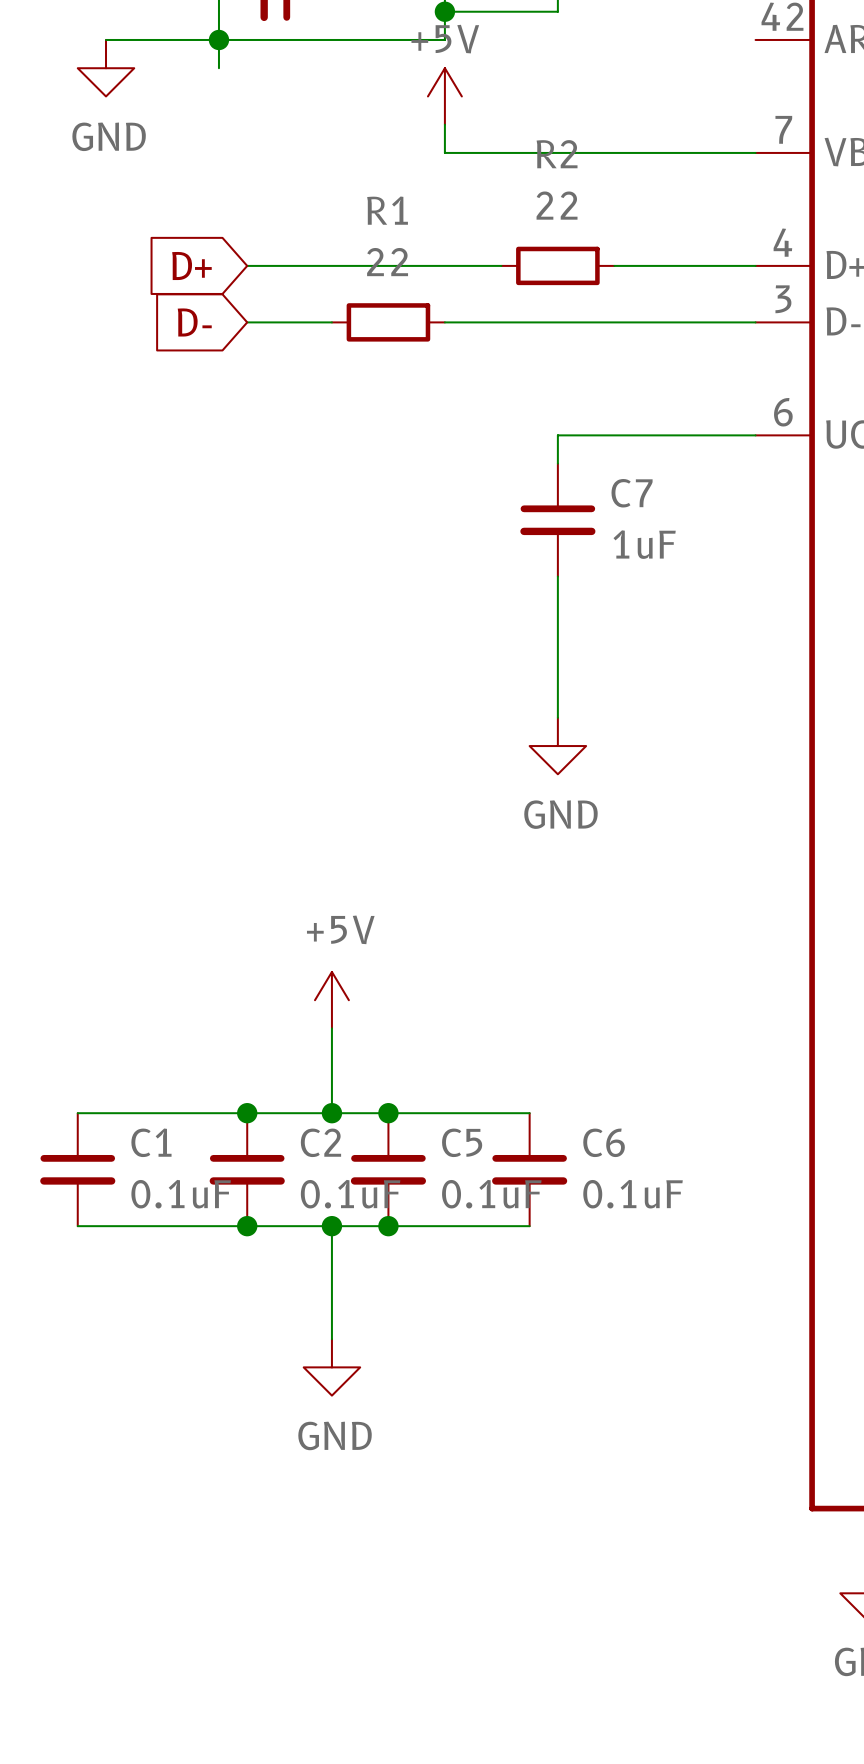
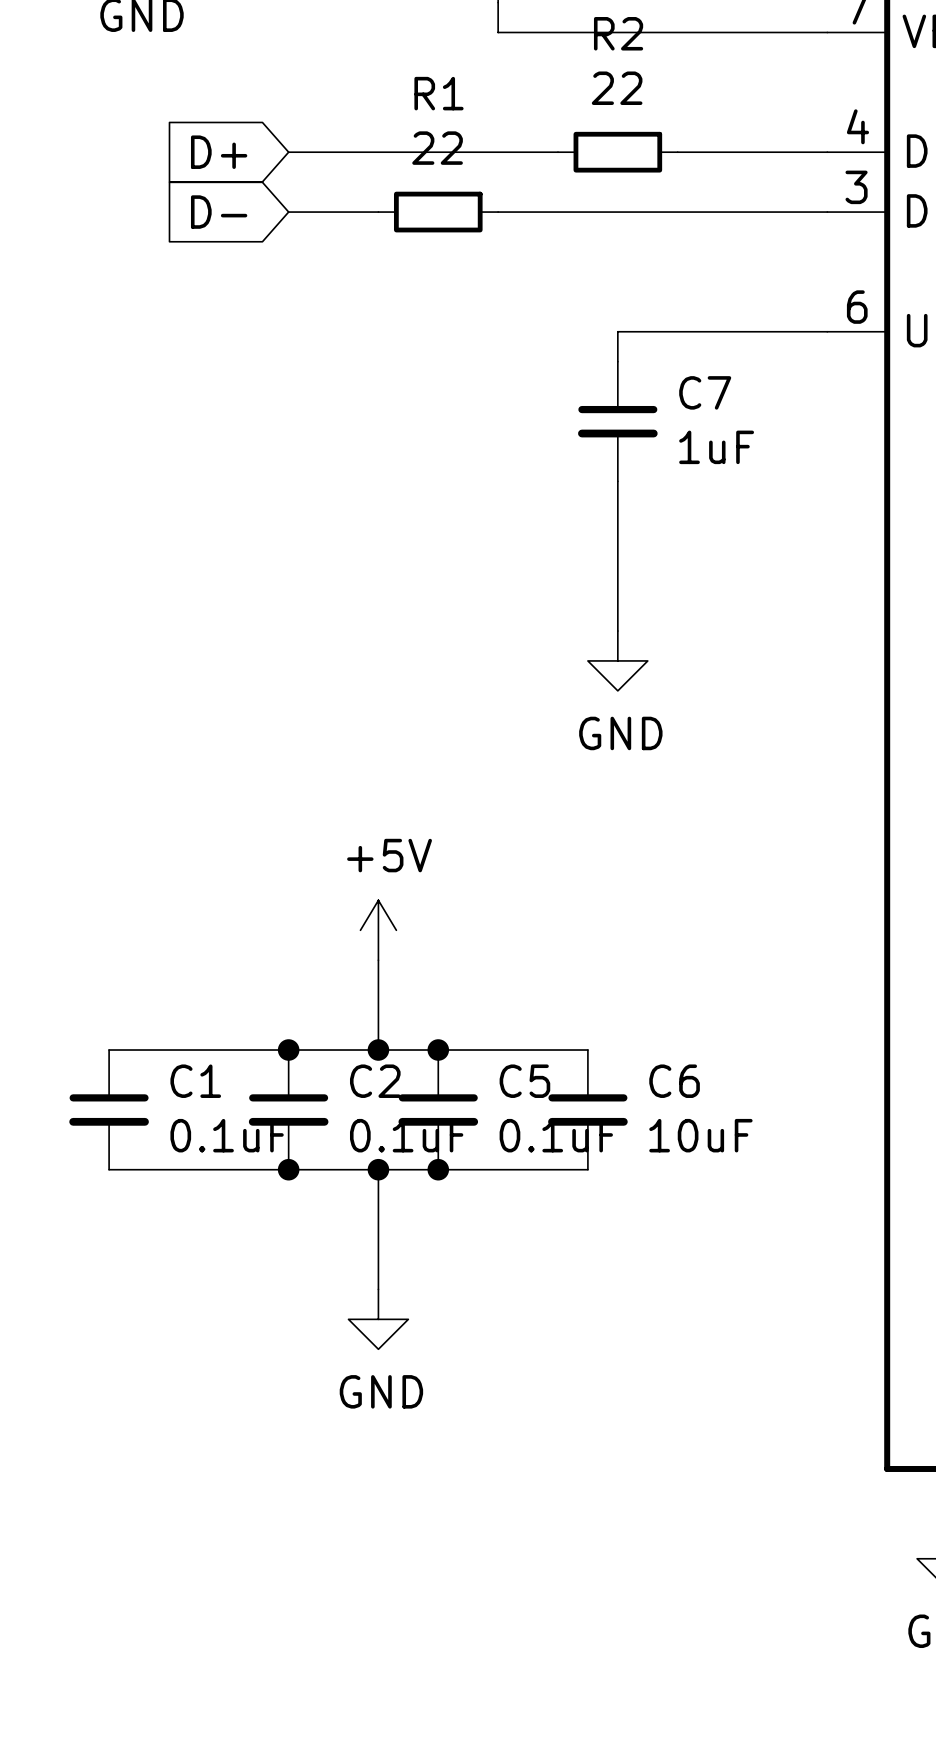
C6 value: 0.1uF (633, 1194) -> 10uF (700, 1135)

